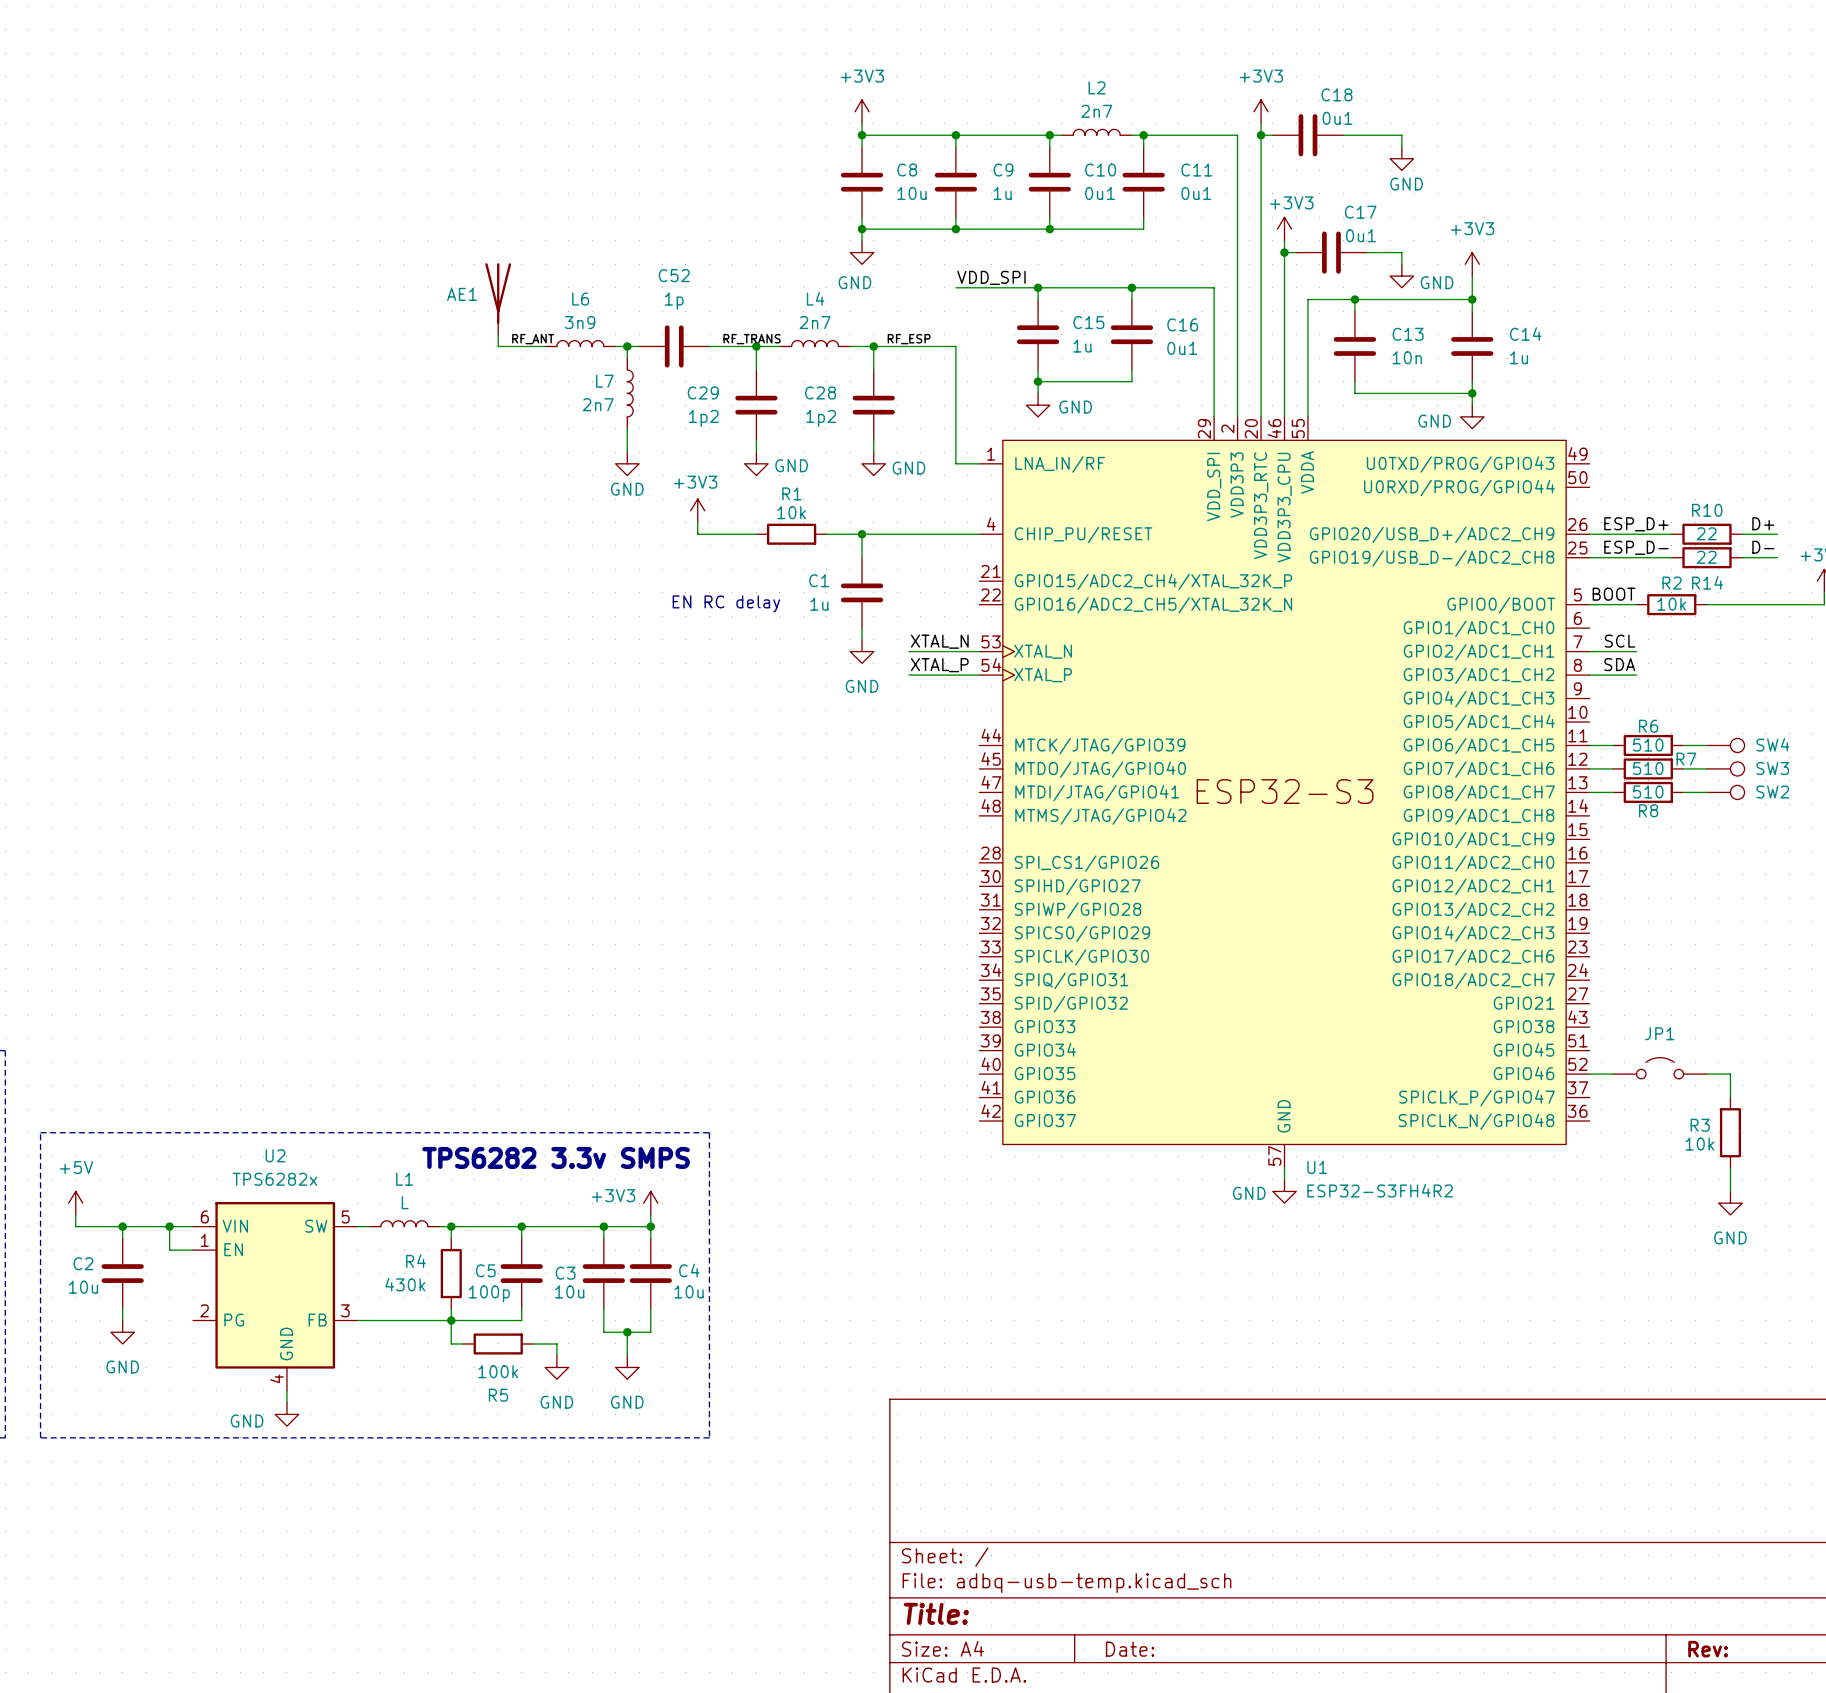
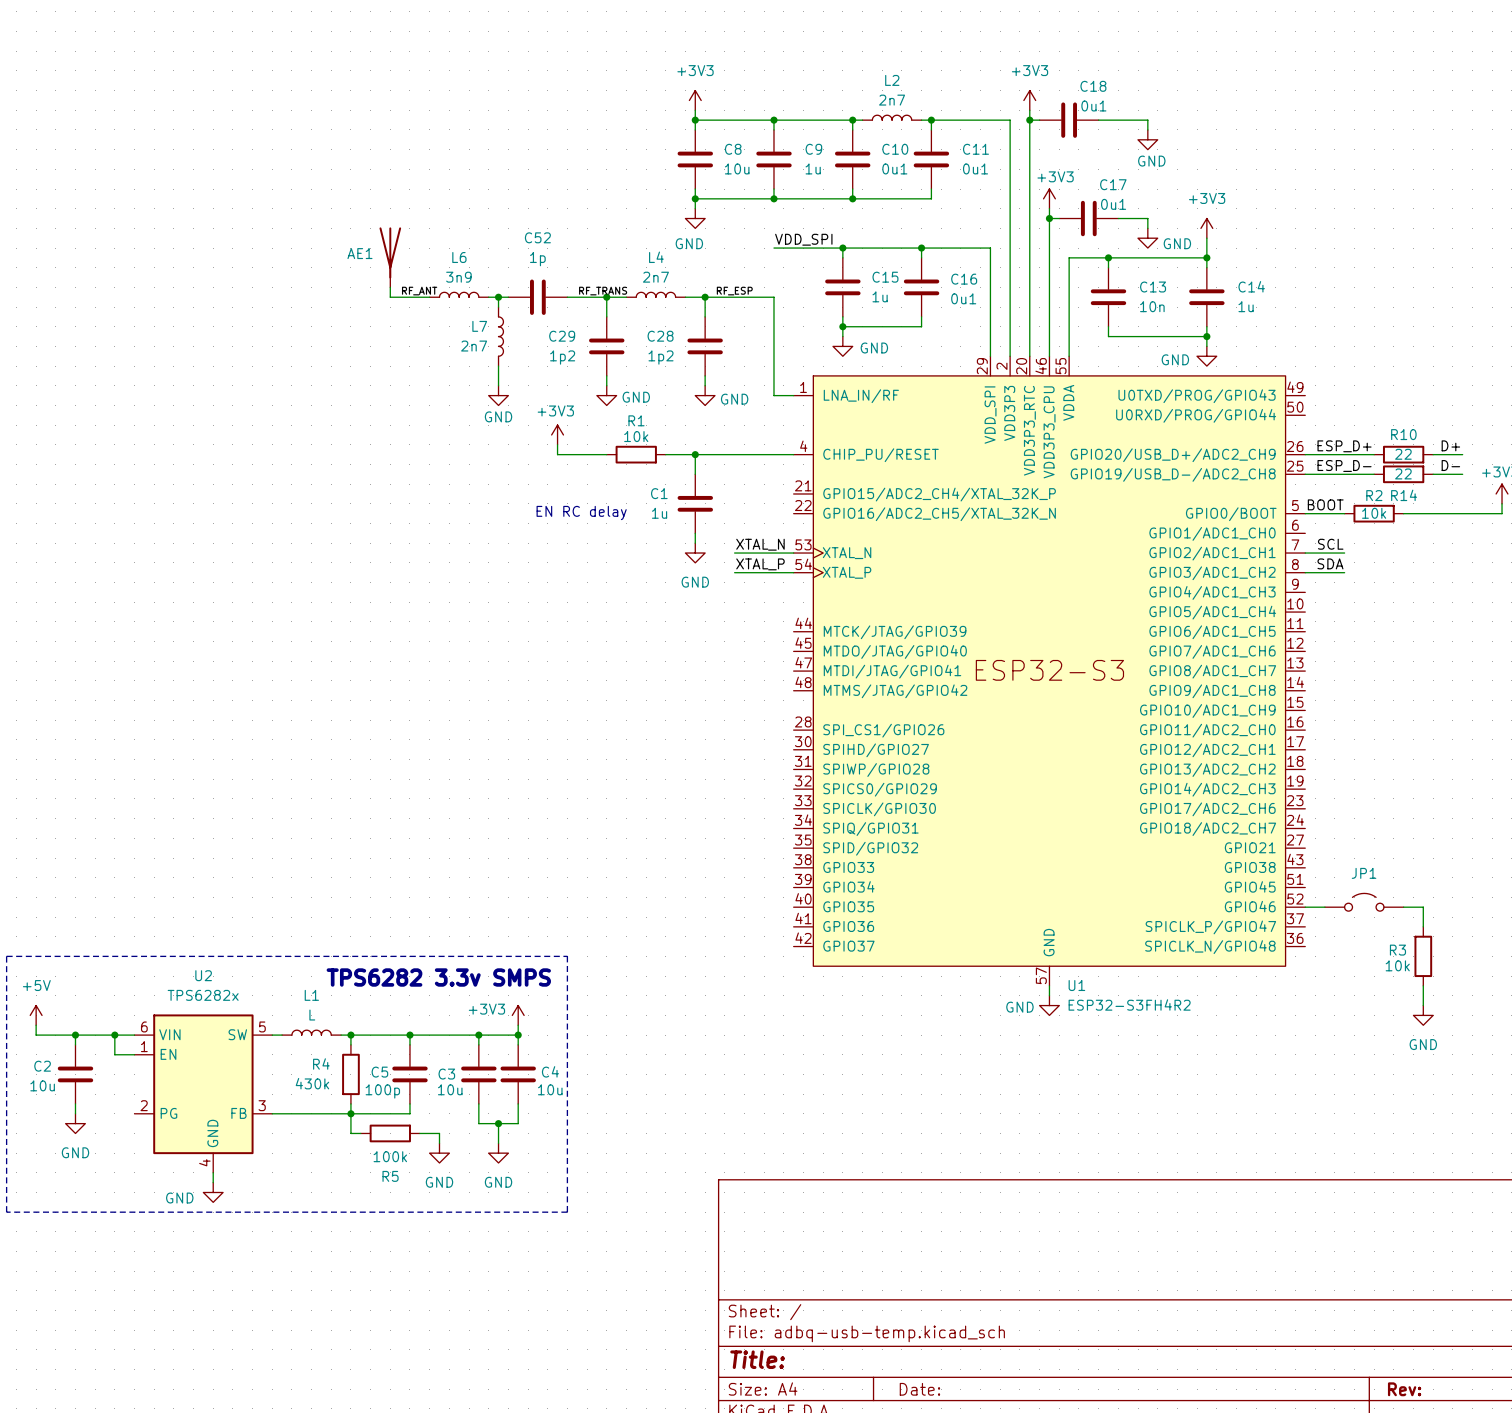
wire: (1589, 745) (1613, 745) -> none
R6: 510 (1648, 745) -> none
wire: (1683, 745) (1706, 745) -> none
SW4: (1725, 745) -> none
wire: (1589, 768) (1613, 768) -> none
R7: 510 (1648, 768) -> none
wire: (1683, 768) (1706, 768) -> none
SW3: (1725, 768) -> none
wire: (1589, 792) (1613, 792) -> none
R8: 510 (1648, 792) -> none
wire: (1683, 792) (1706, 792) -> none
SW2: (1725, 792) -> none

